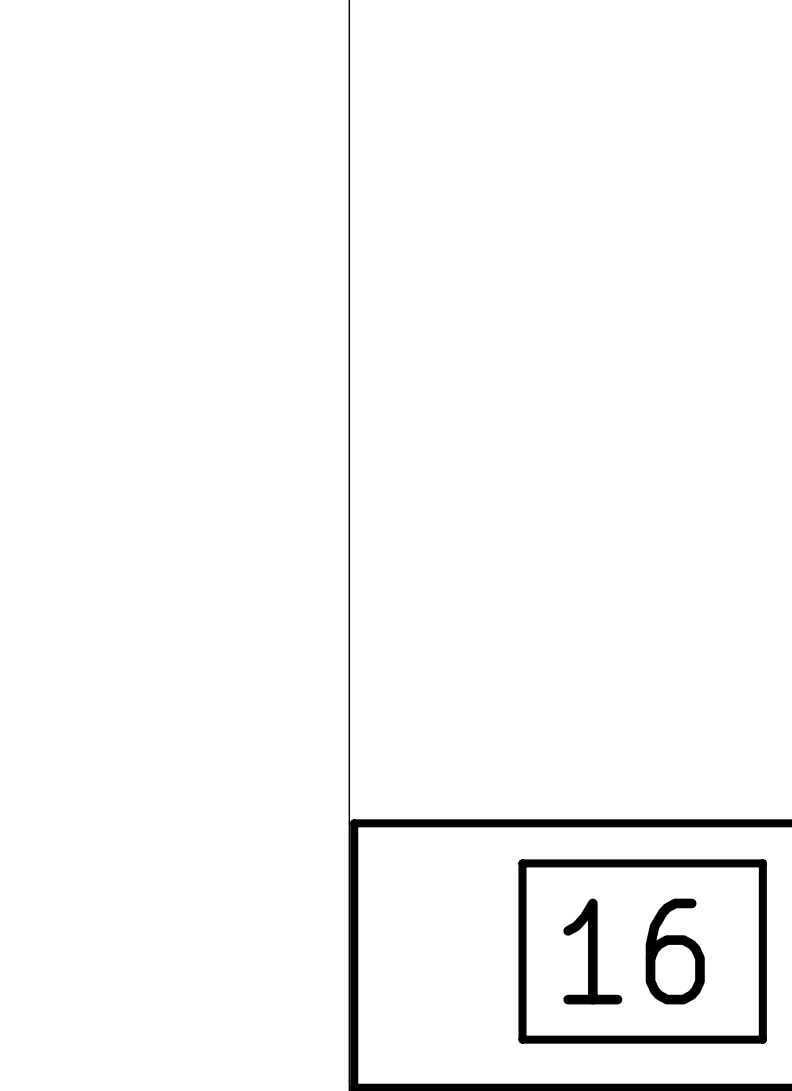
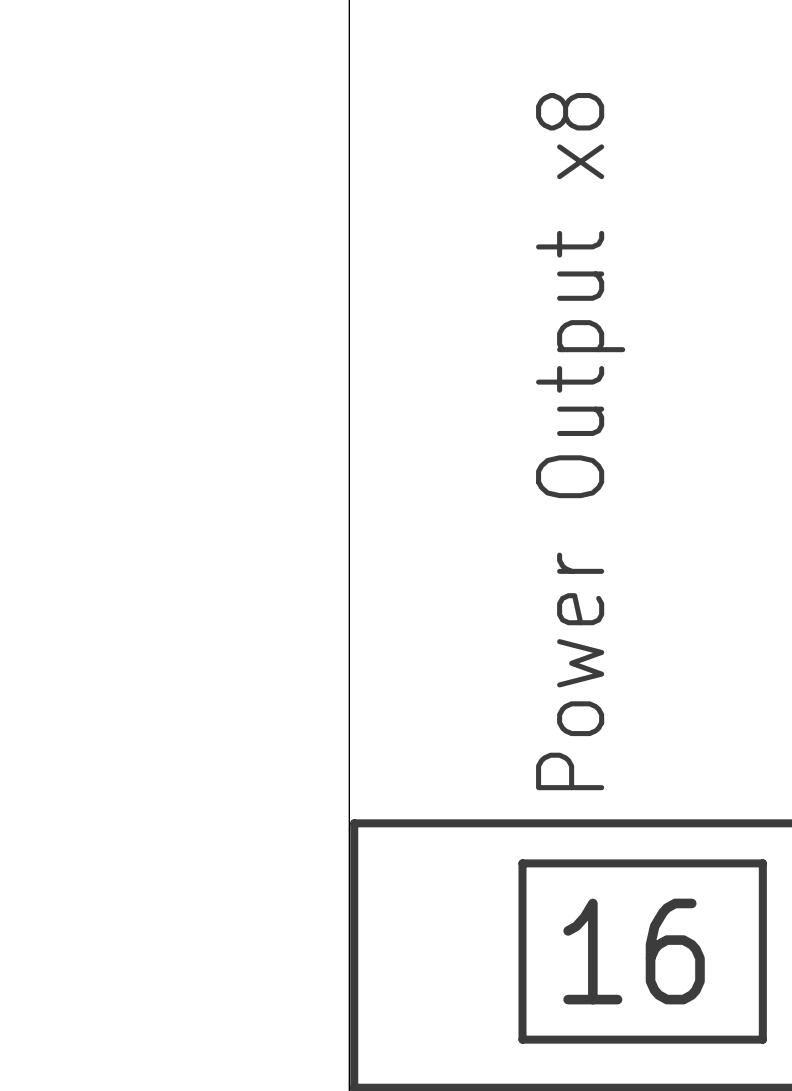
text: none -> Power Output x8 (580, 441)

